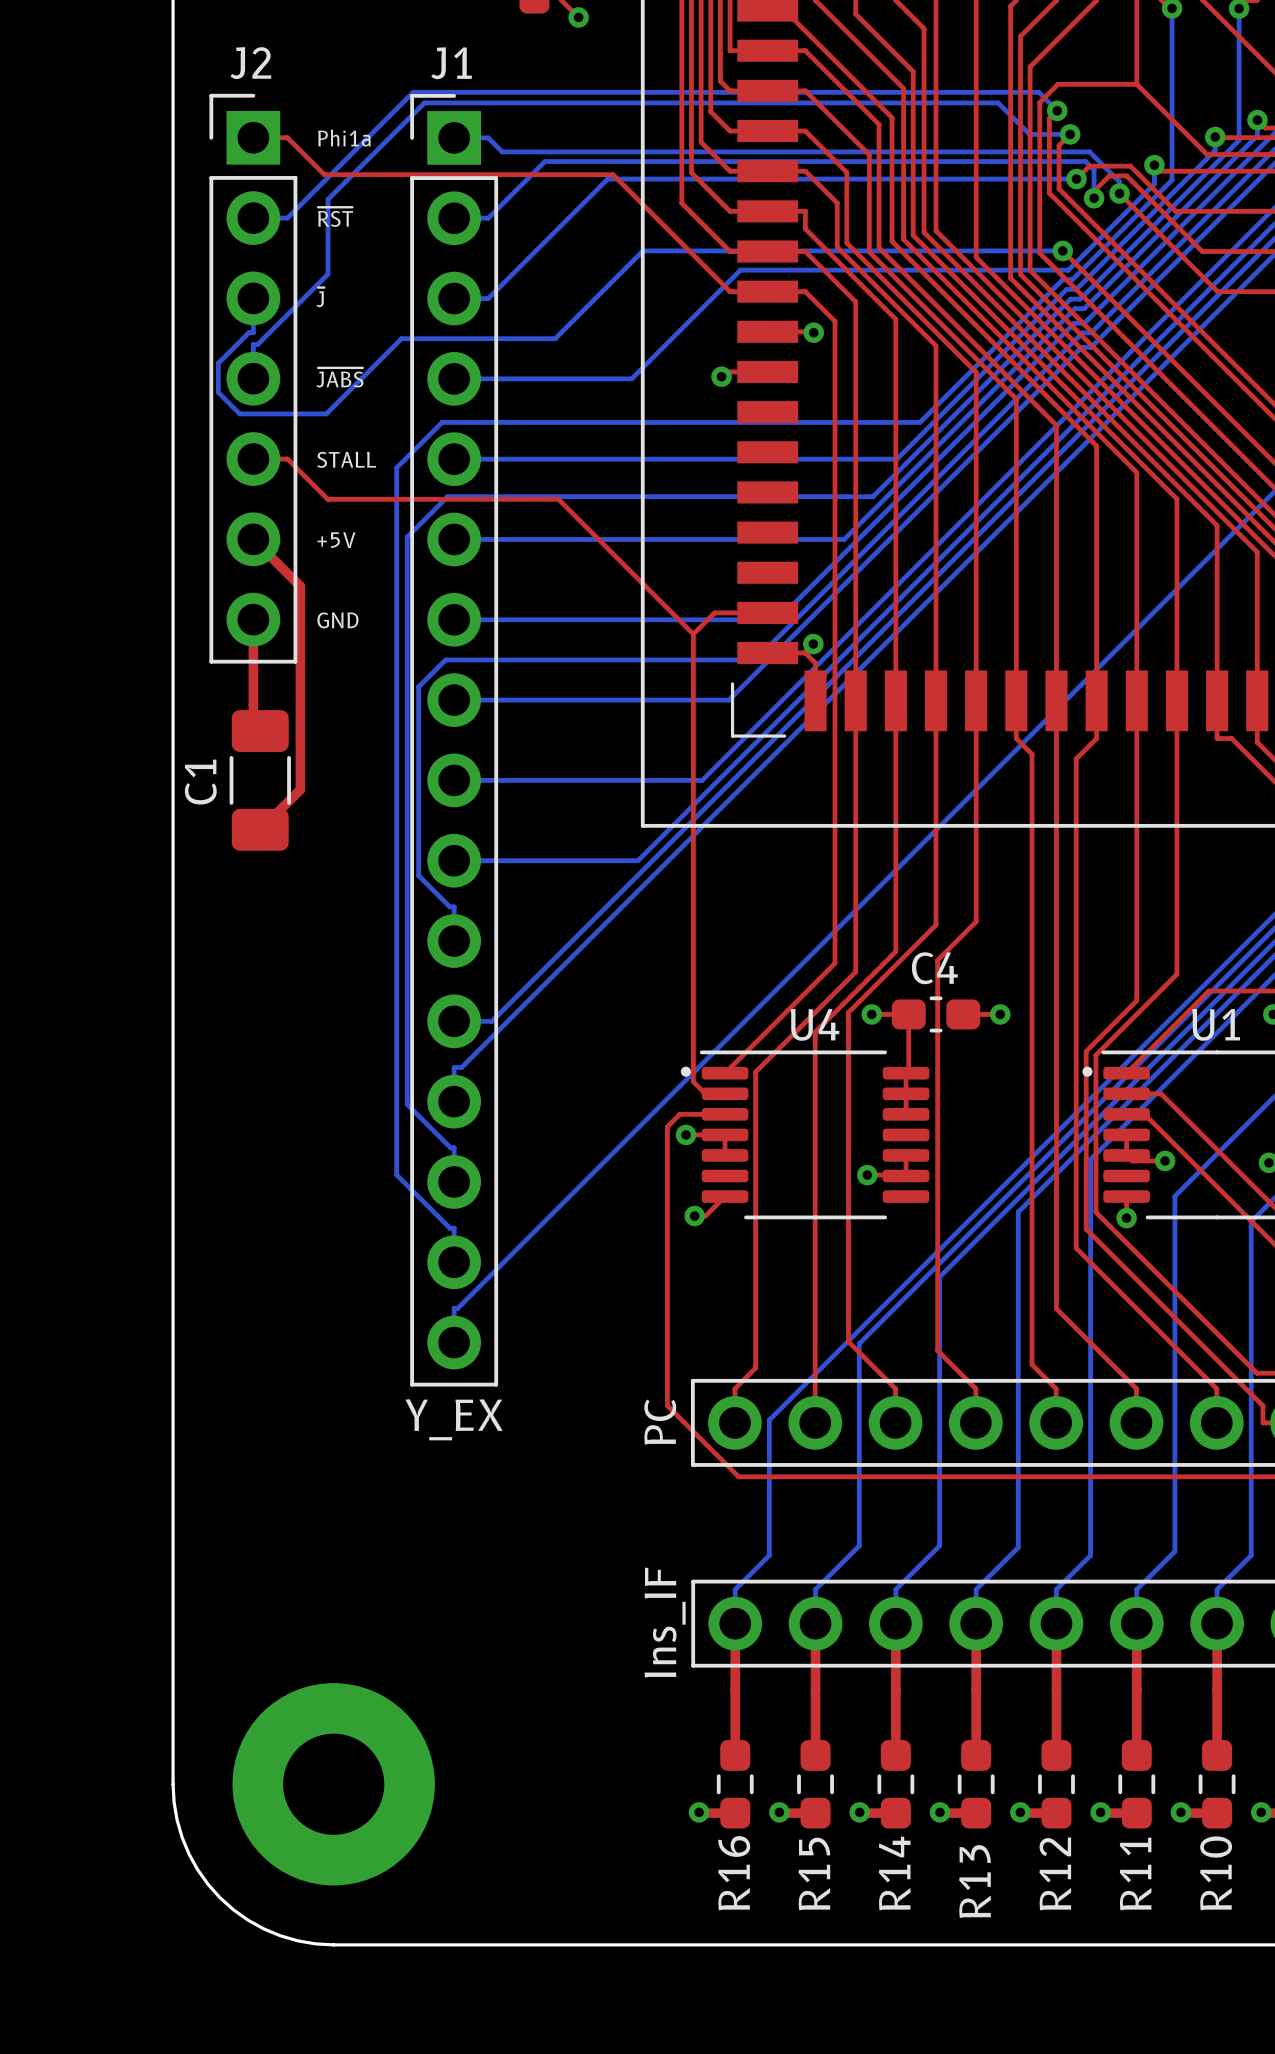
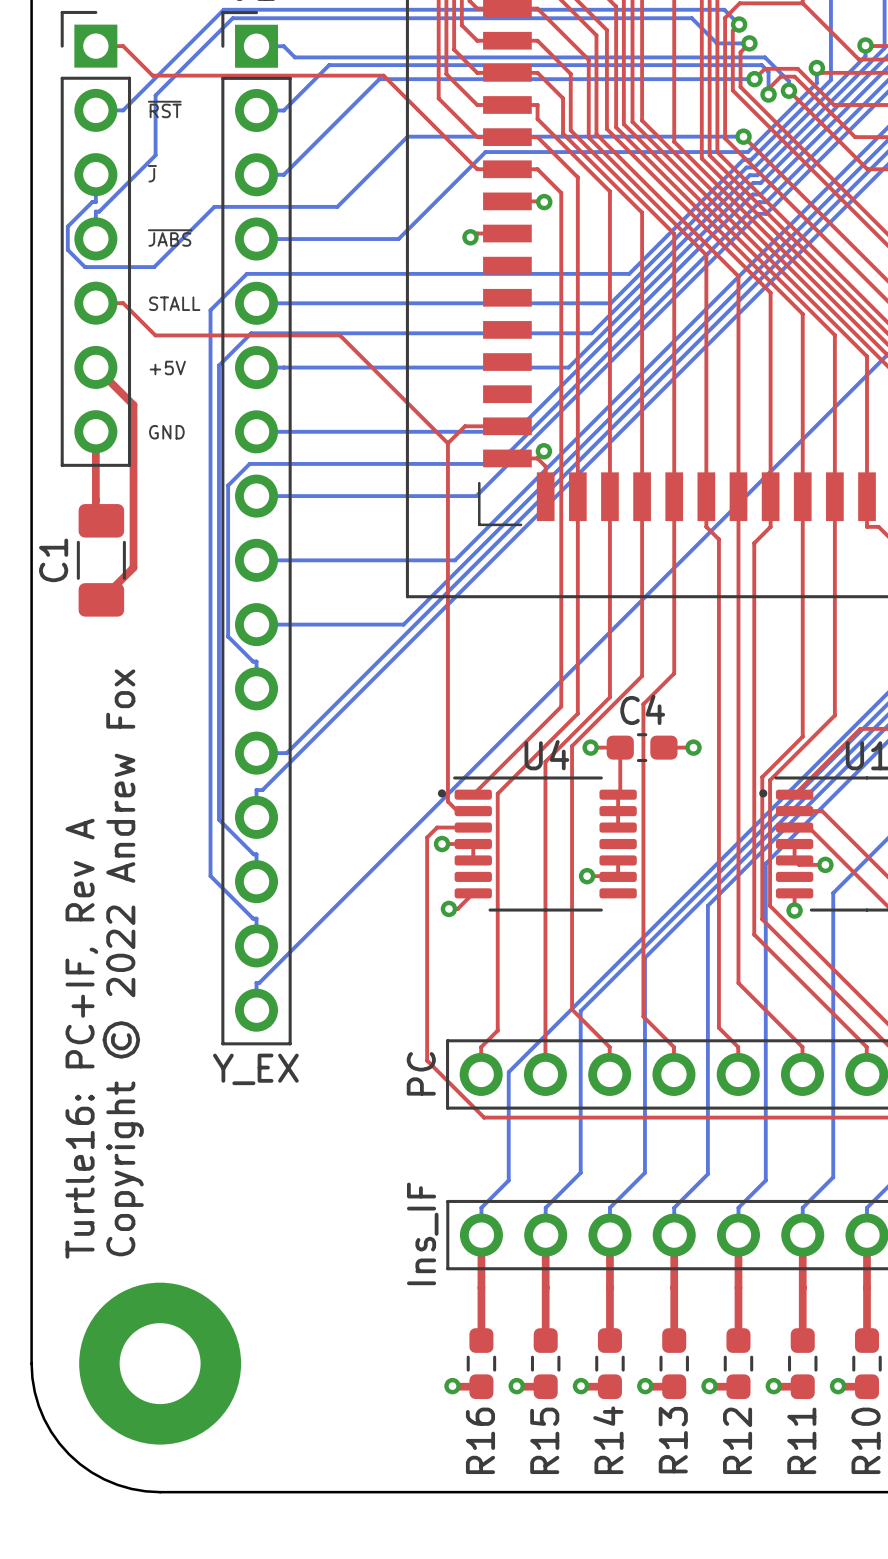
text: Phi1a (344, 138) -> none
text: none -> Copyright © 2022 Andrew Fox (123, 962)
text: none -> Turtle16: PC+IF, Rev A (81, 1038)

